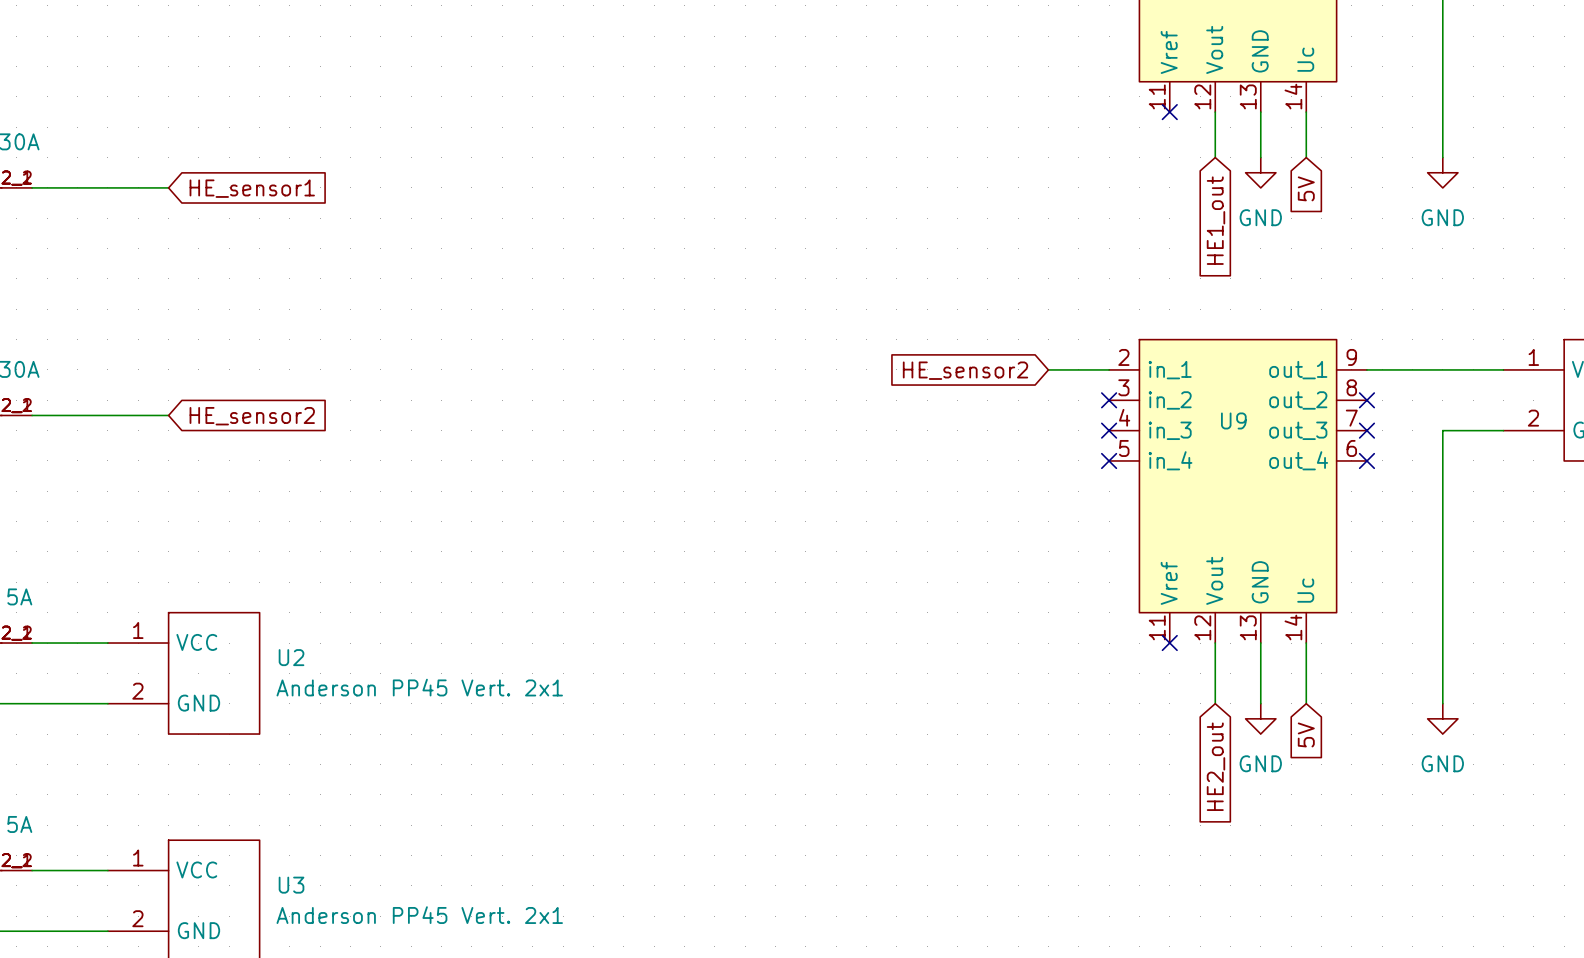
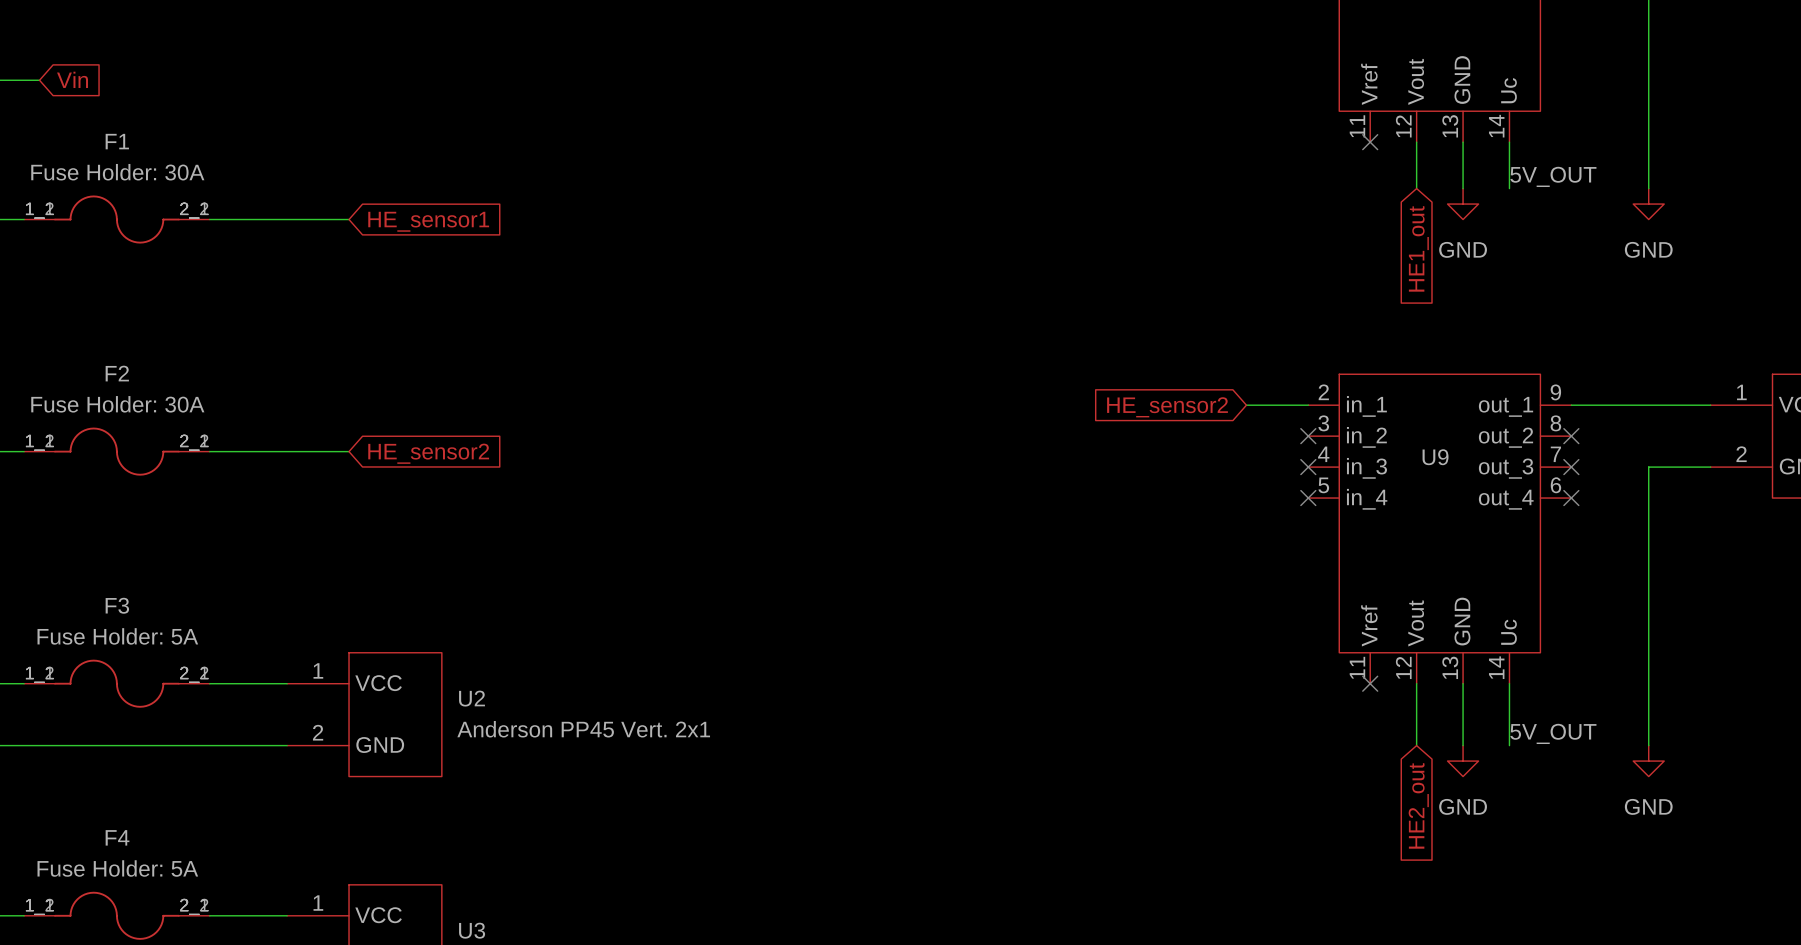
label: none -> 5V_OUT (1553, 176)
global label: 5V (1306, 188) -> none
label: none -> 5V_OUT (1553, 733)
global label: 5V (1306, 734) -> none

